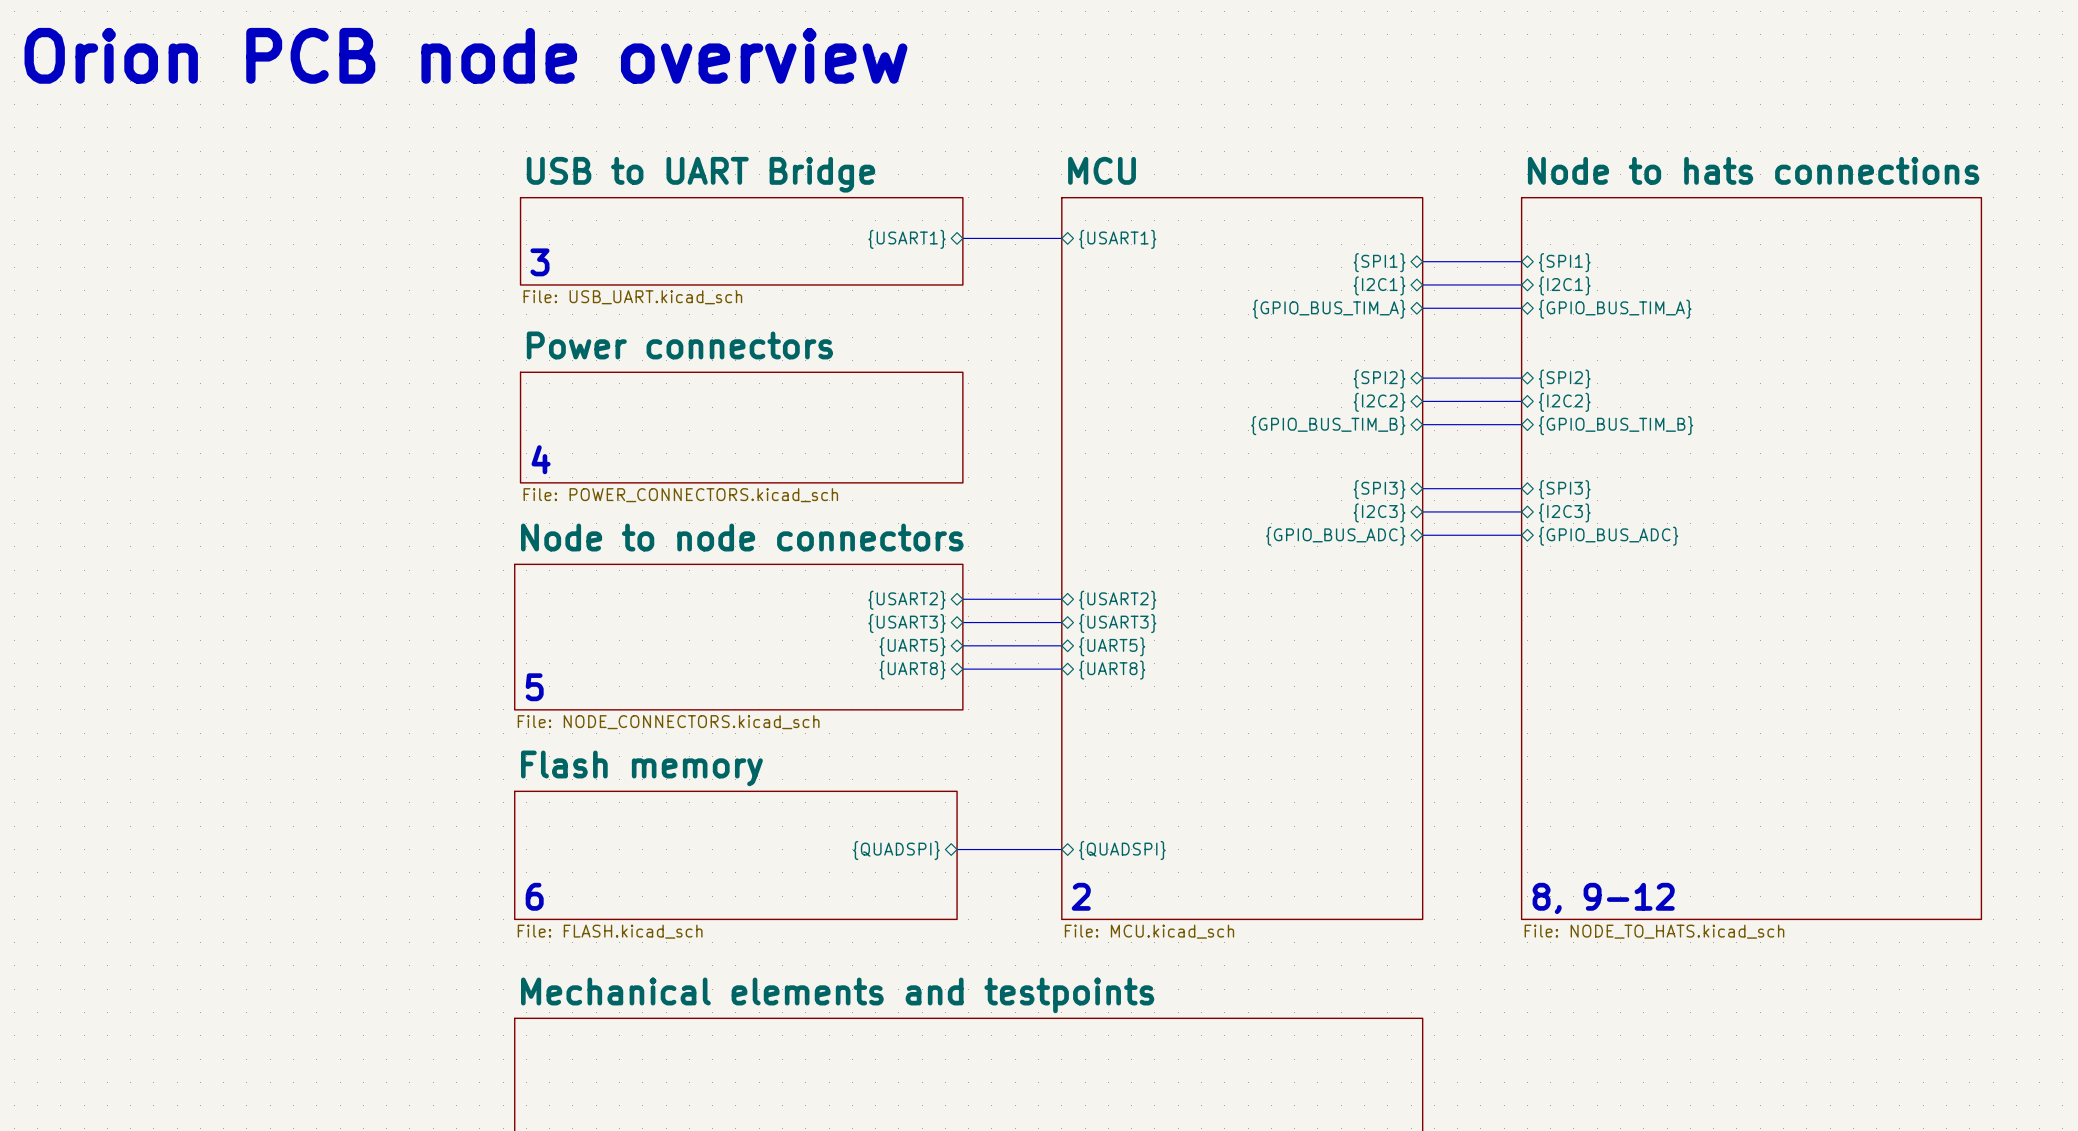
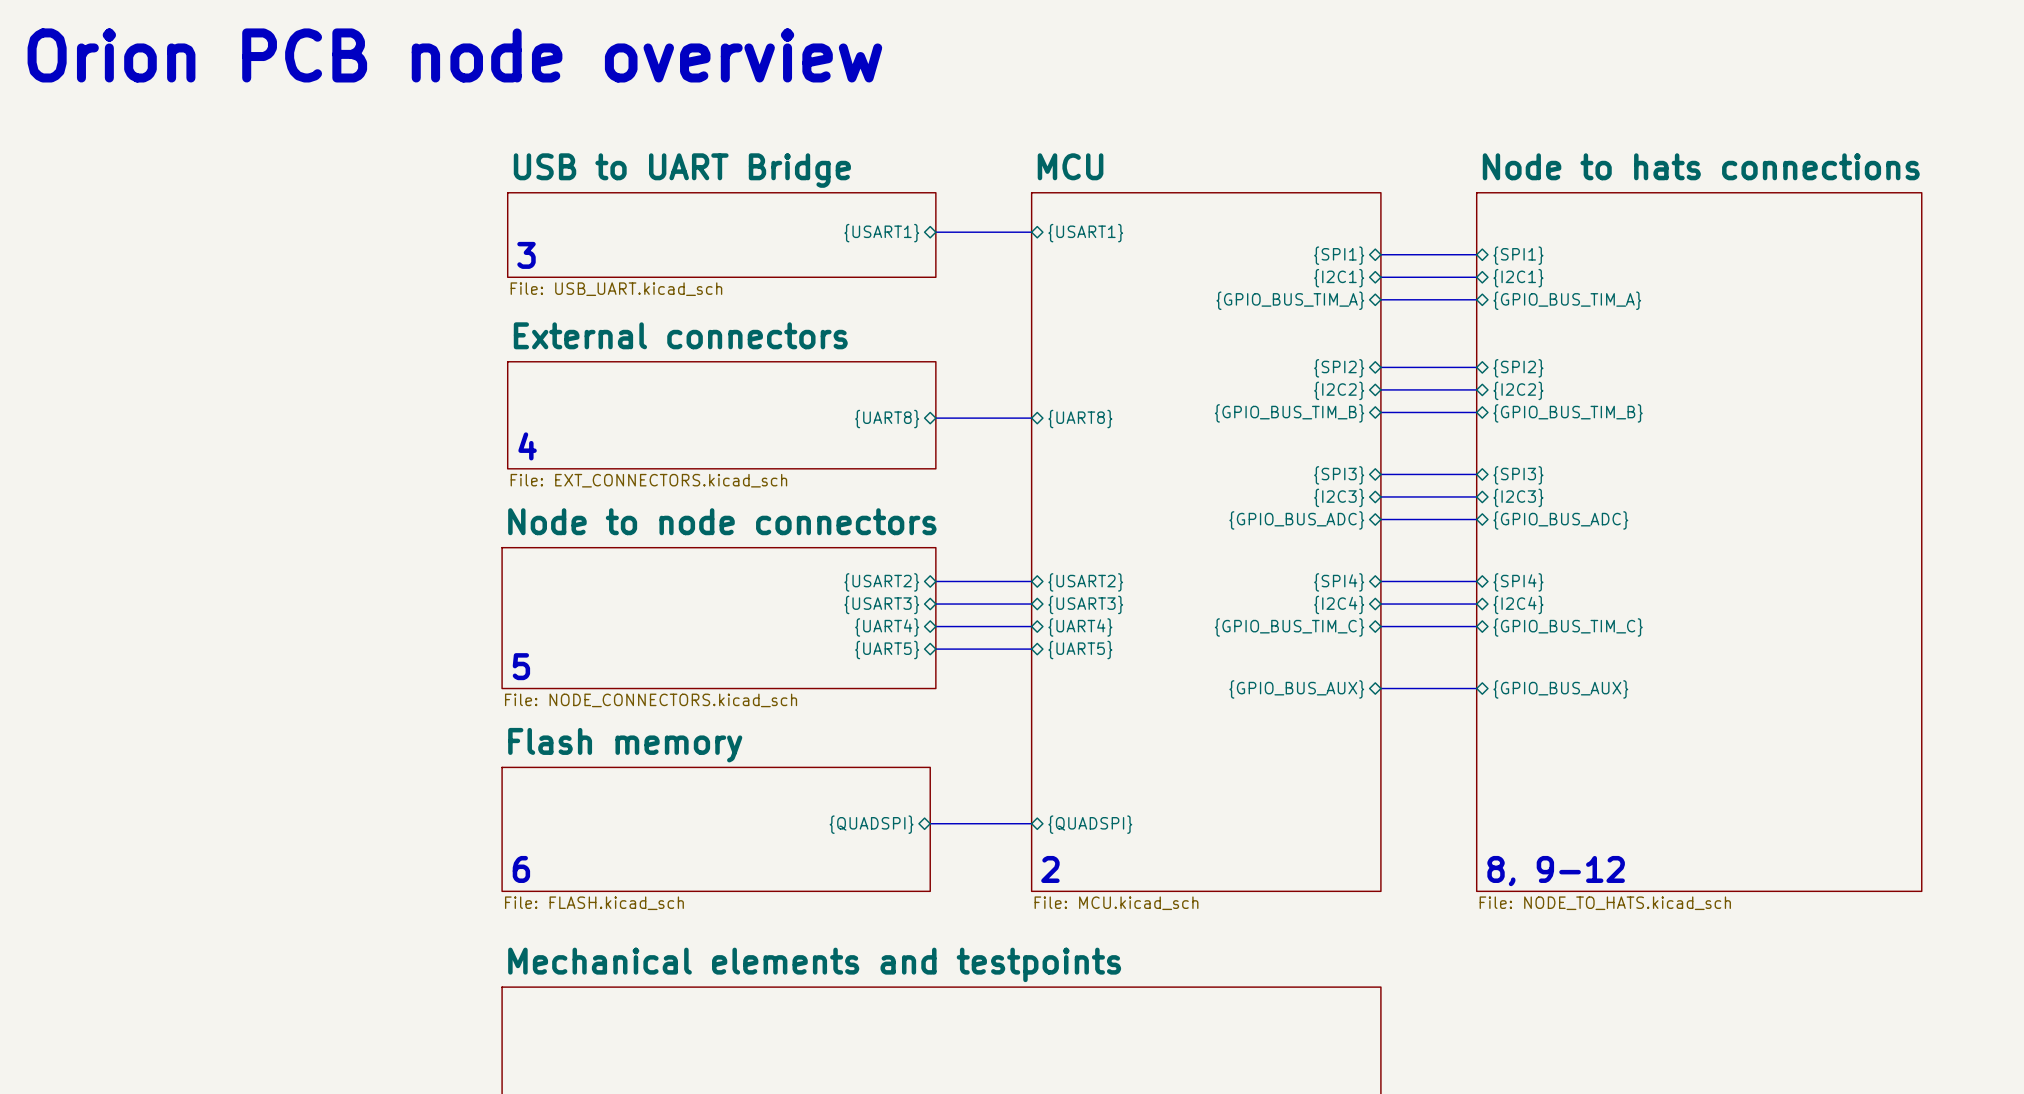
sheet Power connectors name: Power connectors (679, 345) -> External connectors (680, 335)
bus: none -> (935, 418) (1031, 418)
sheet pin: none -> {UART8} (887, 419)
sheet pin: none -> {UART8} (1080, 419)
sheet Power connectors value: File: POWER_CONNECTORS.kicad_sch (680, 495) -> File: EXT_CONNECTORS.kicad_sch (648, 480)
bus: none -> (1380, 581) (1476, 581)
sheet pin: none -> {SPI4} (1339, 582)
sheet pin: none -> {SPI4} (1518, 582)
bus: none -> (1380, 604) (1476, 604)
sheet pin: none -> {I2C4} (1339, 604)
sheet pin: none -> {I2C4} (1518, 604)
bus: none -> (1380, 626) (1476, 626)
sheet pin: {UART5} (912, 646) -> {UART4} (887, 627)
sheet pin: {UART5} (1112, 646) -> {UART4} (1080, 627)
sheet pin: none -> {GPIO_BUS_TIM_C} (1289, 627)
sheet pin: none -> {GPIO_BUS_TIM_C} (1568, 627)
sheet pin: {UART8} (912, 670) -> {UART5} (887, 650)
sheet pin: {UART8} (1112, 670) -> {UART5} (1080, 650)
bus: none -> (1380, 688) (1476, 688)
sheet pin: none -> {GPIO_BUS_AUX} (1296, 689)
sheet pin: none -> {GPIO_BUS_AUX} (1560, 689)

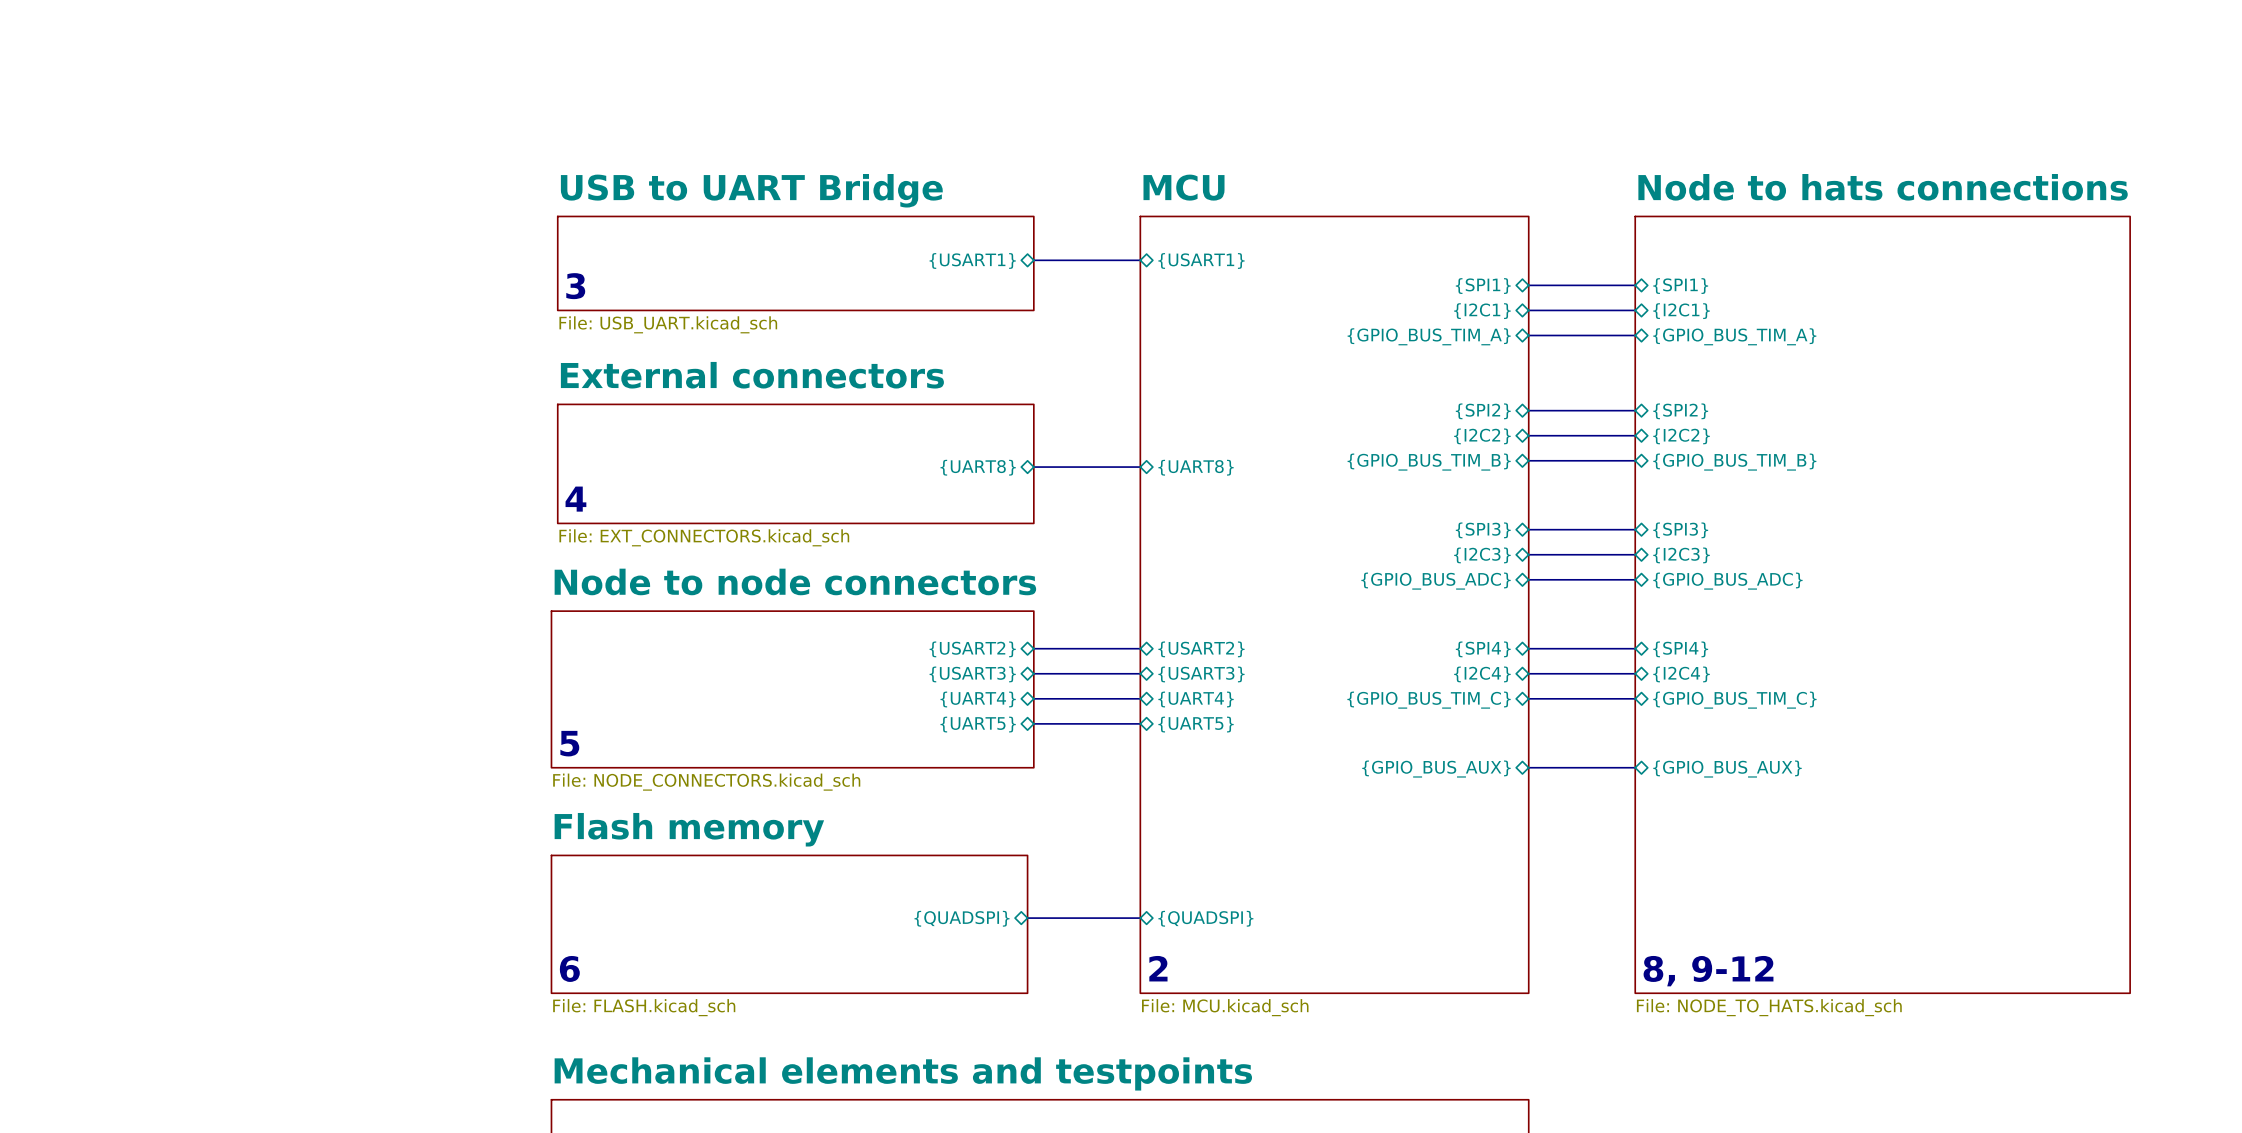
text: Orion PCB node overview (454, 55) -> none

